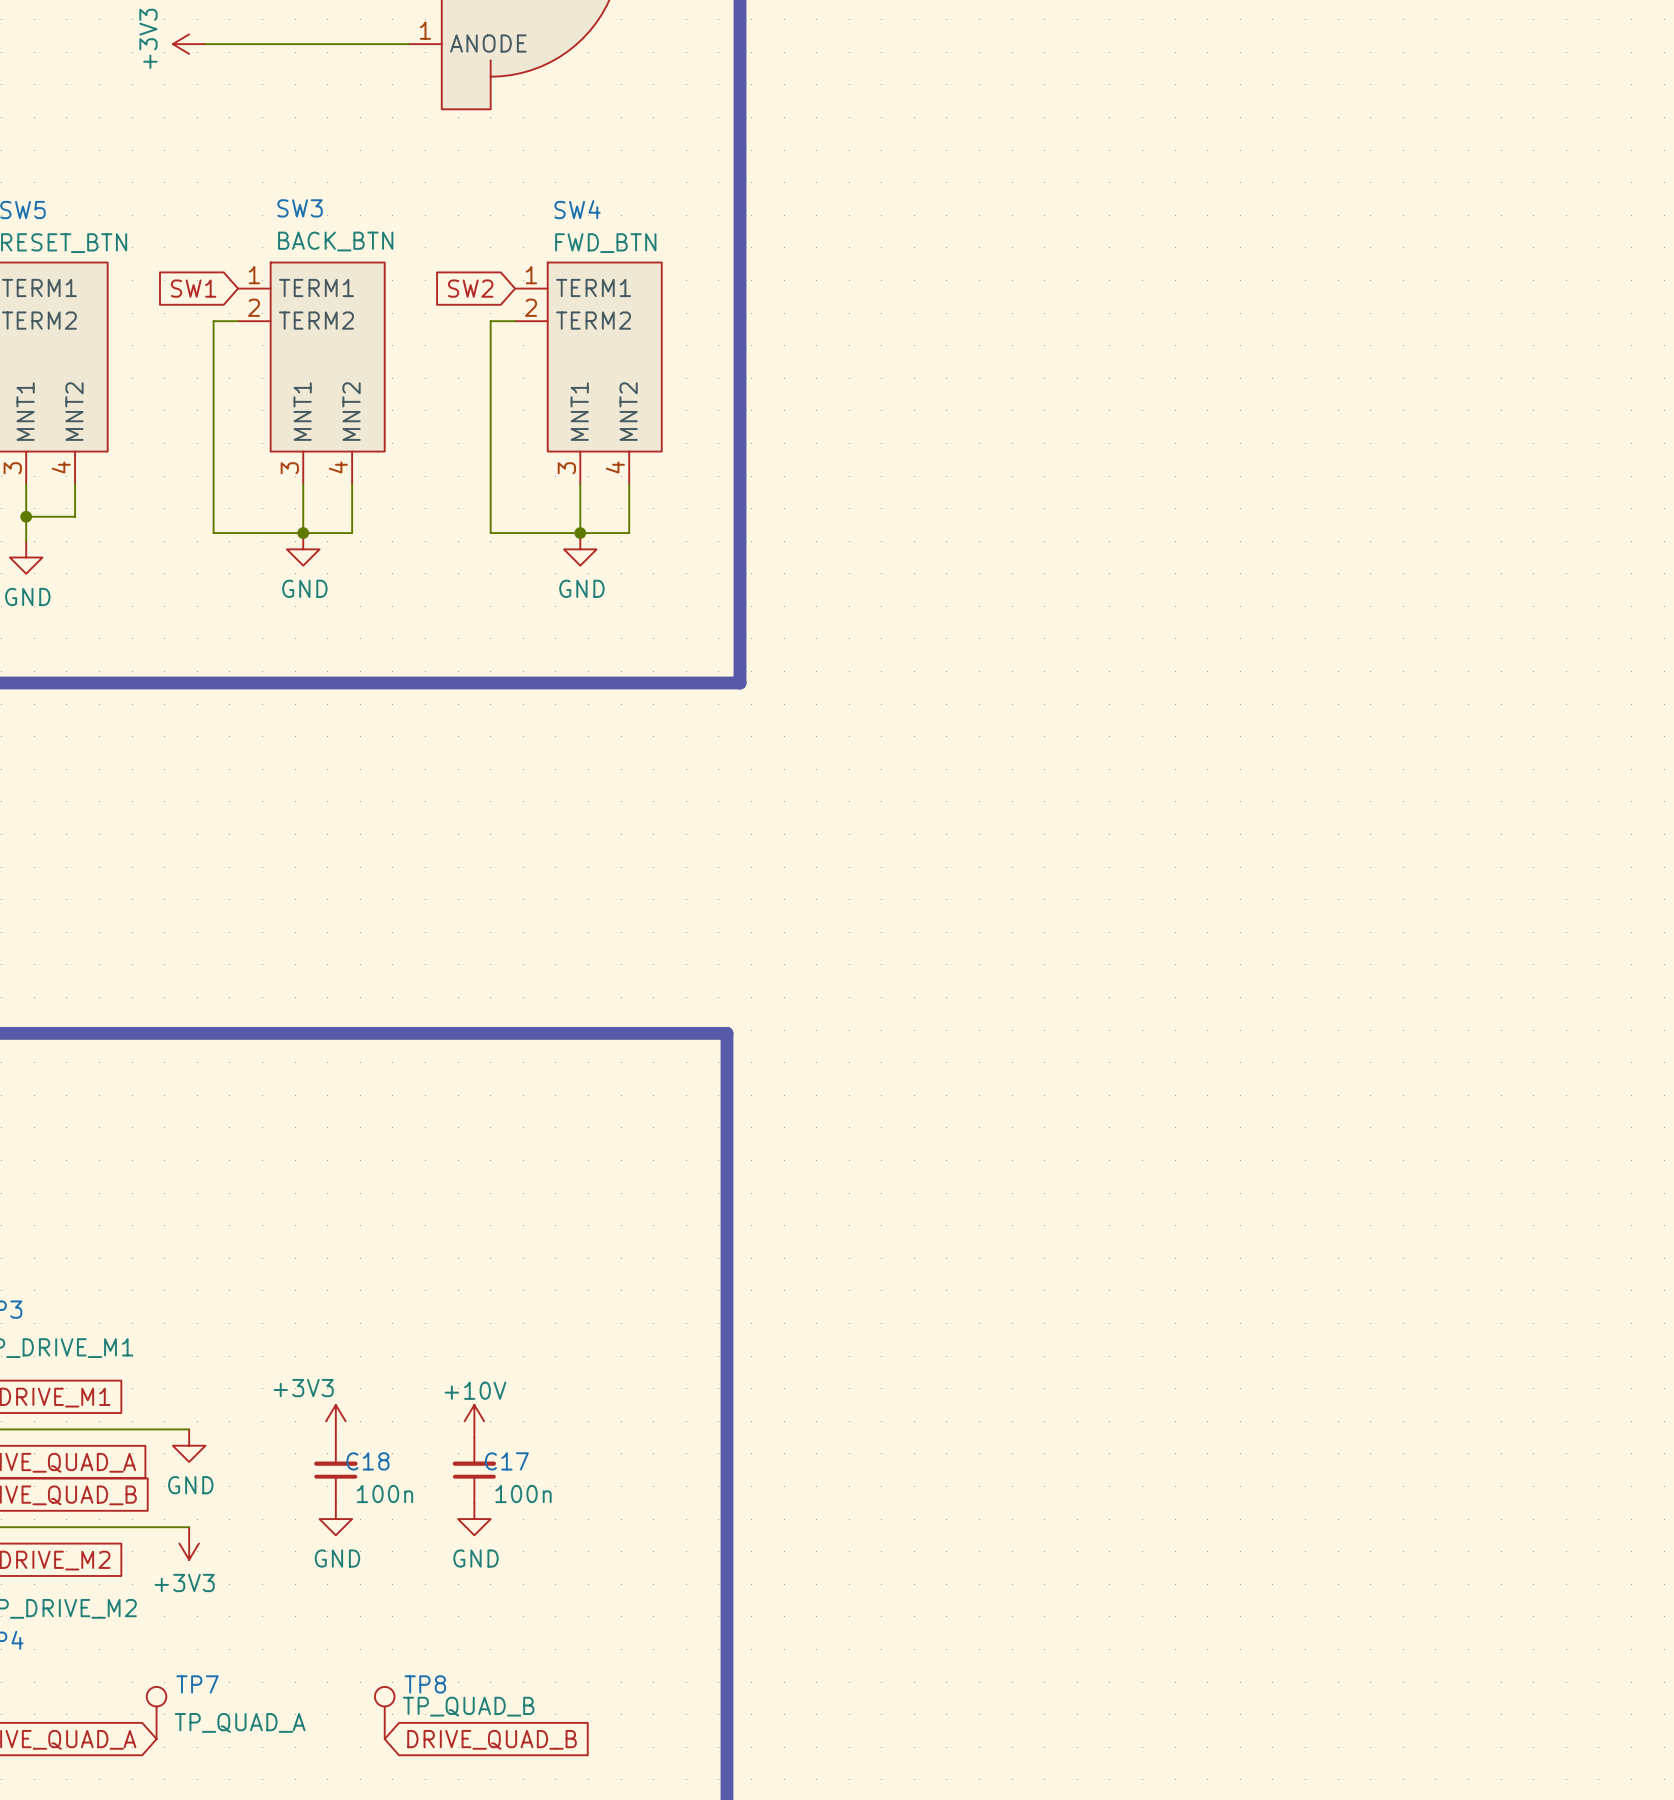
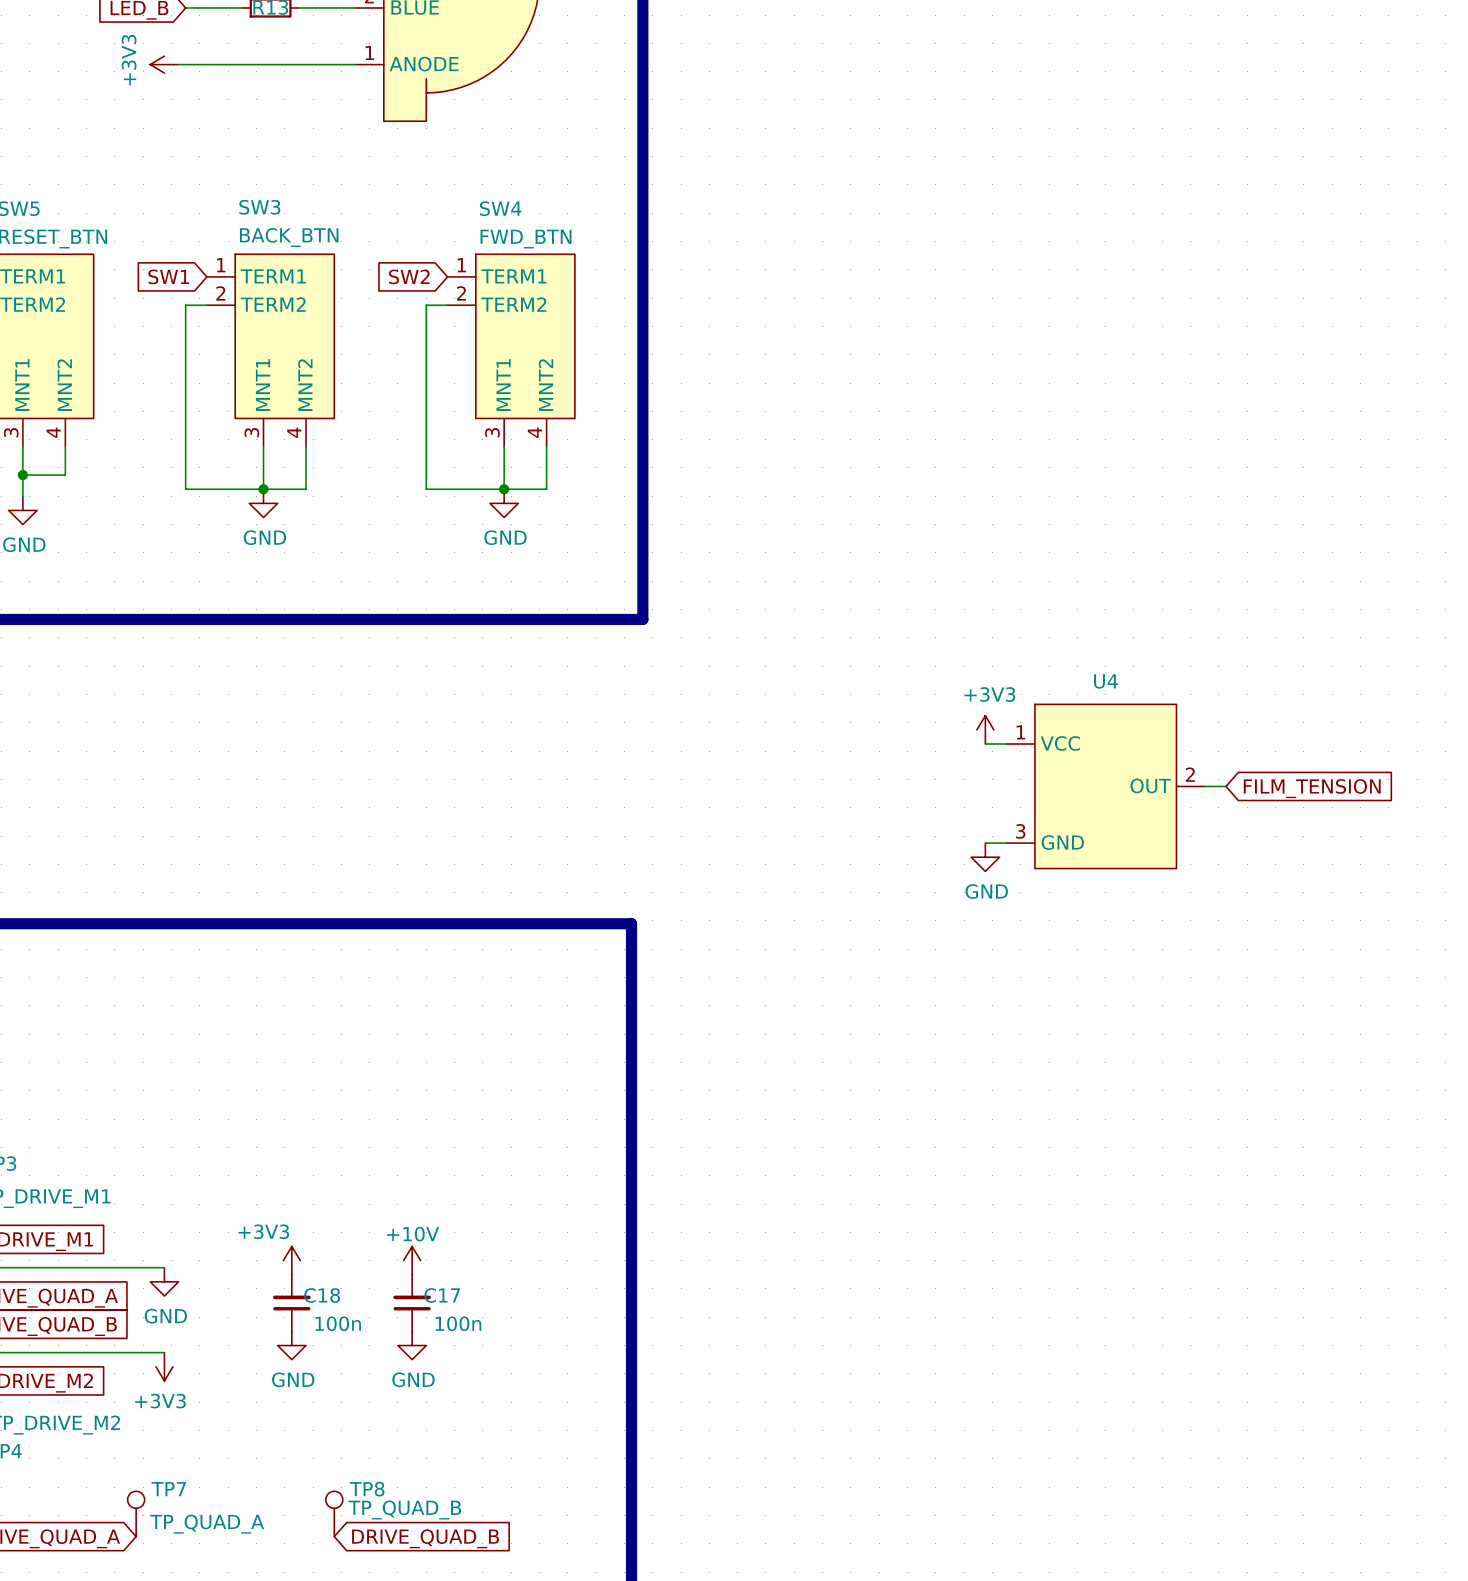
power symbol: none -> +3V3 (985, 729)
wire: none -> (985, 744) (1006, 744)
U4: none -> (1105, 786)
wire: none -> (1204, 786) (1225, 786)
global label: none -> FILM_TENSION (1312, 788)
wire: none -> (985, 843) (1006, 843)
power symbol: none -> GND (985, 857)

